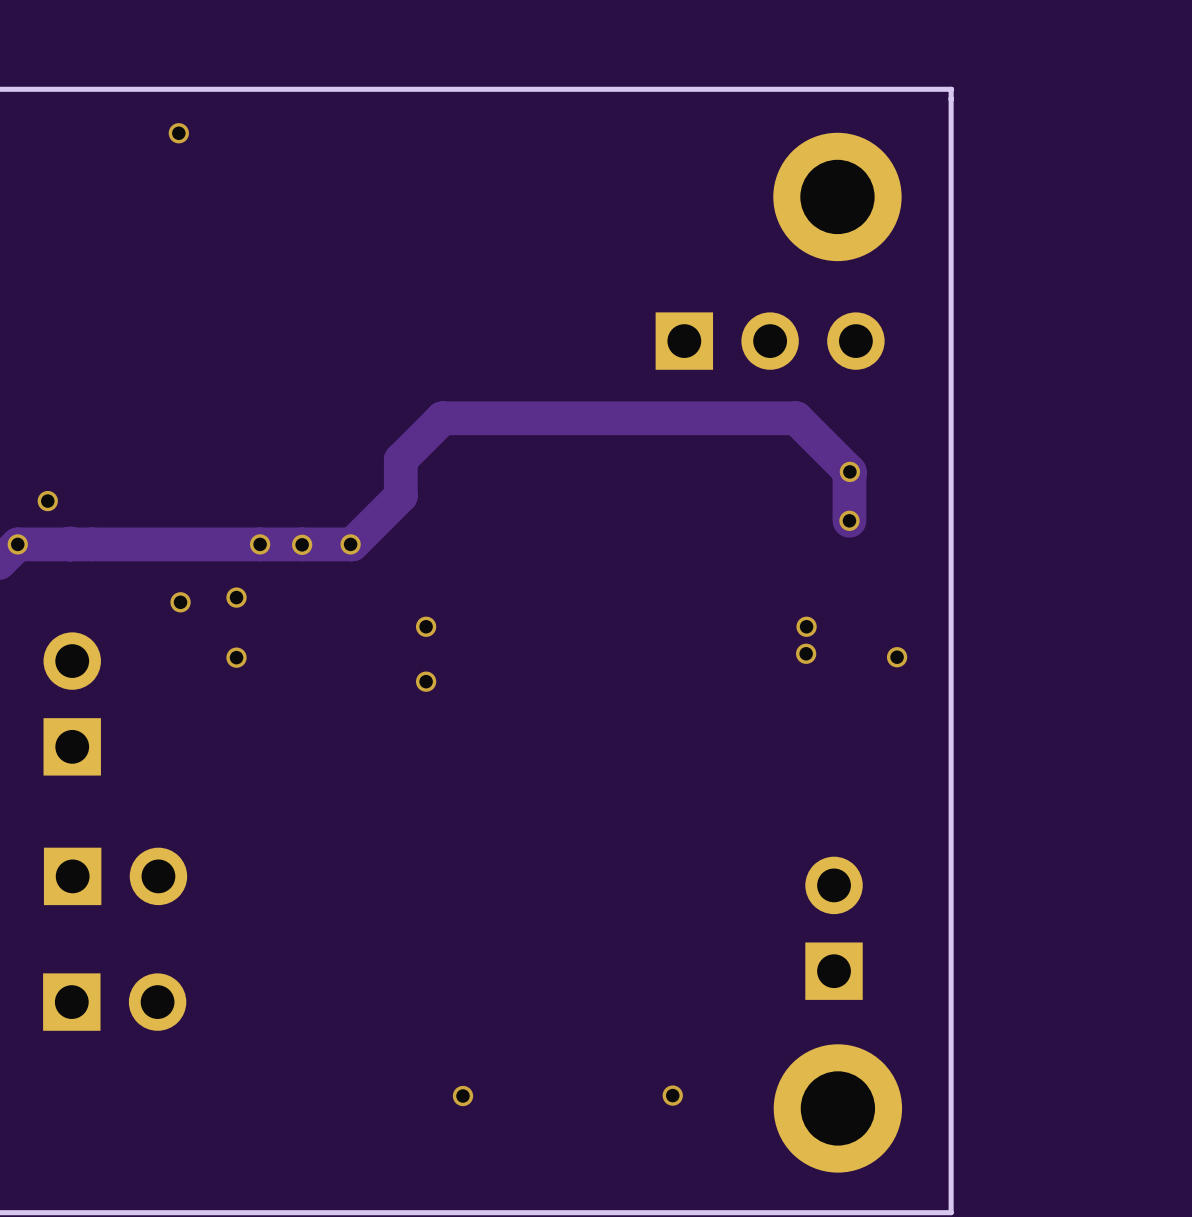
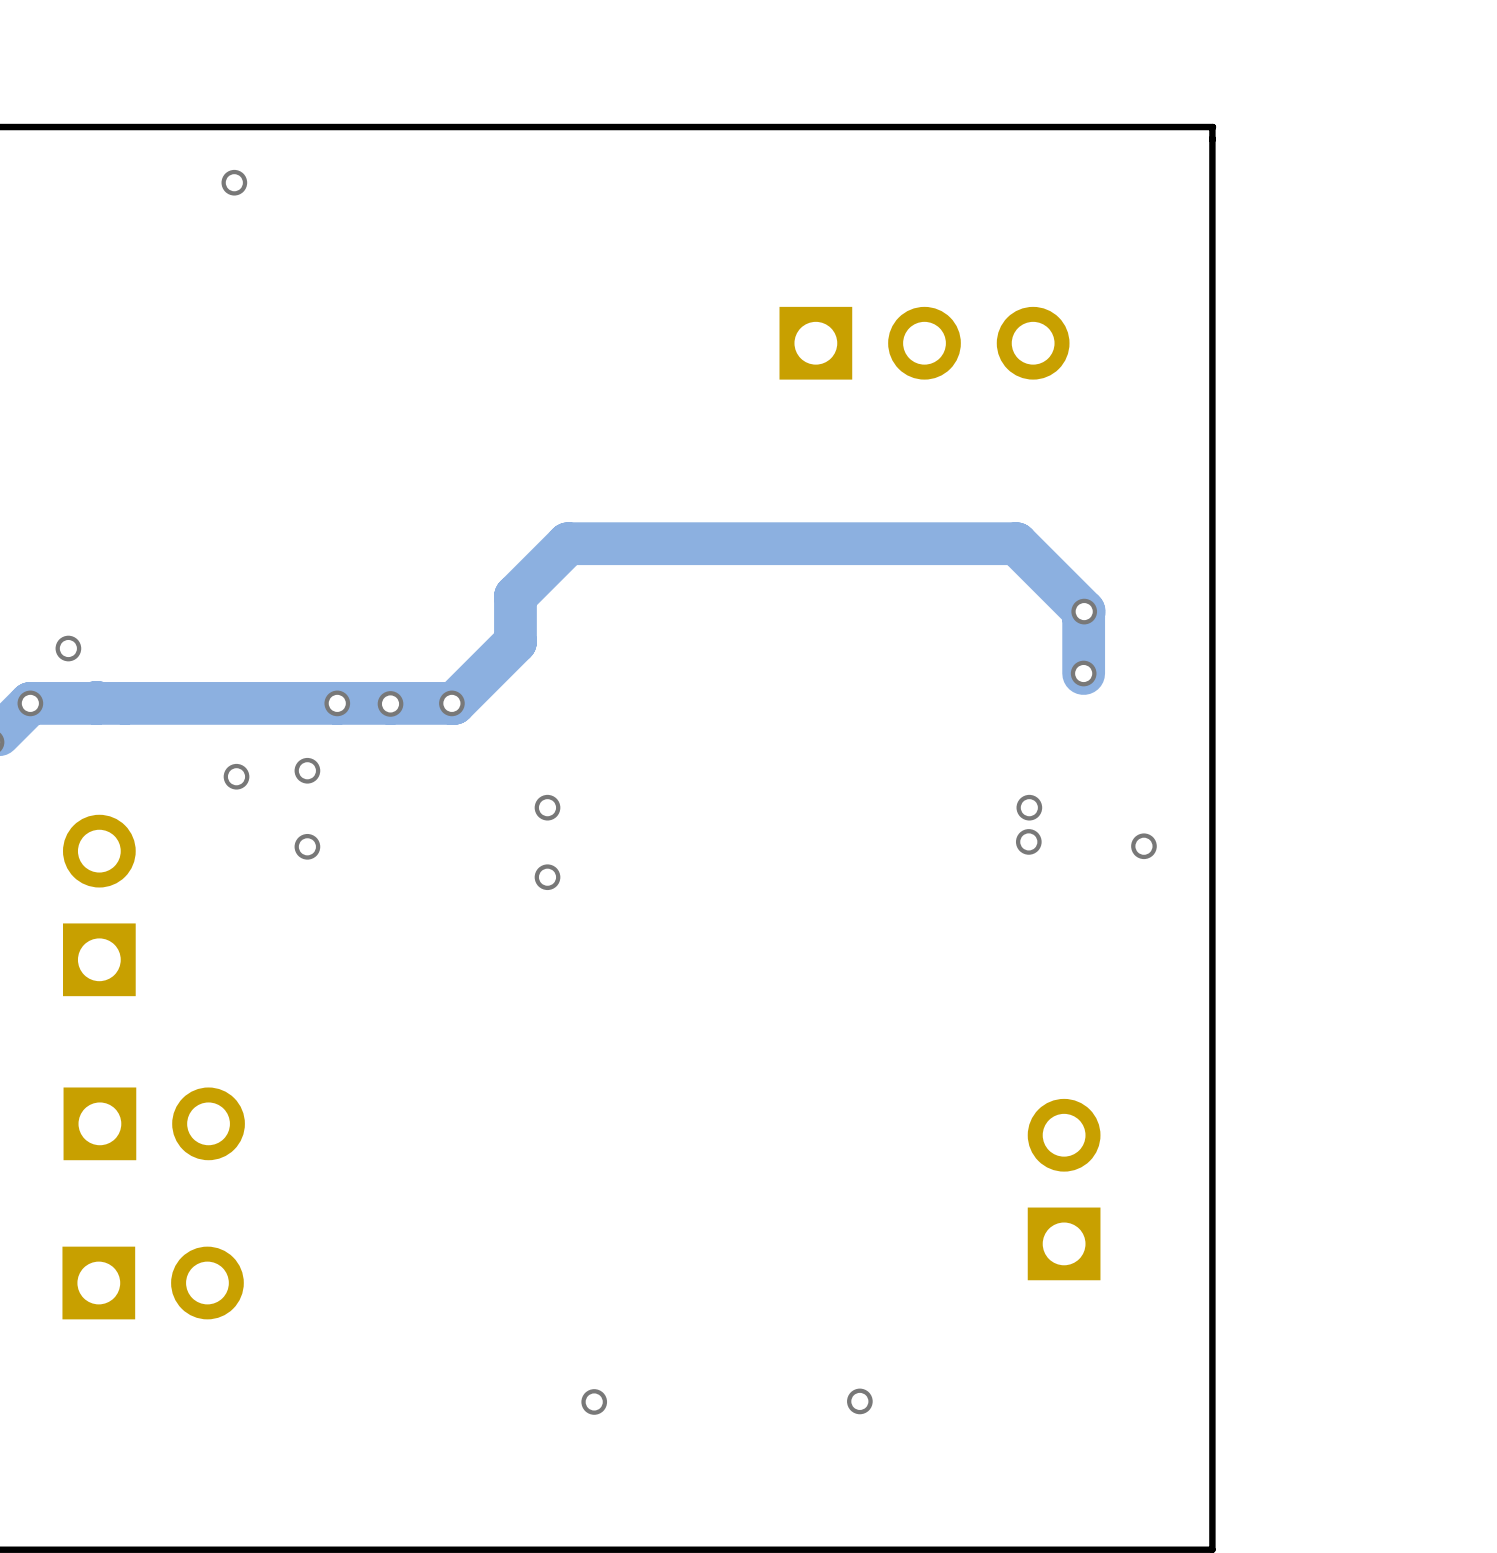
part: (837, 196) -> none
part position: (770, 341) -> (924, 343)
part: (837, 1108) -> none

